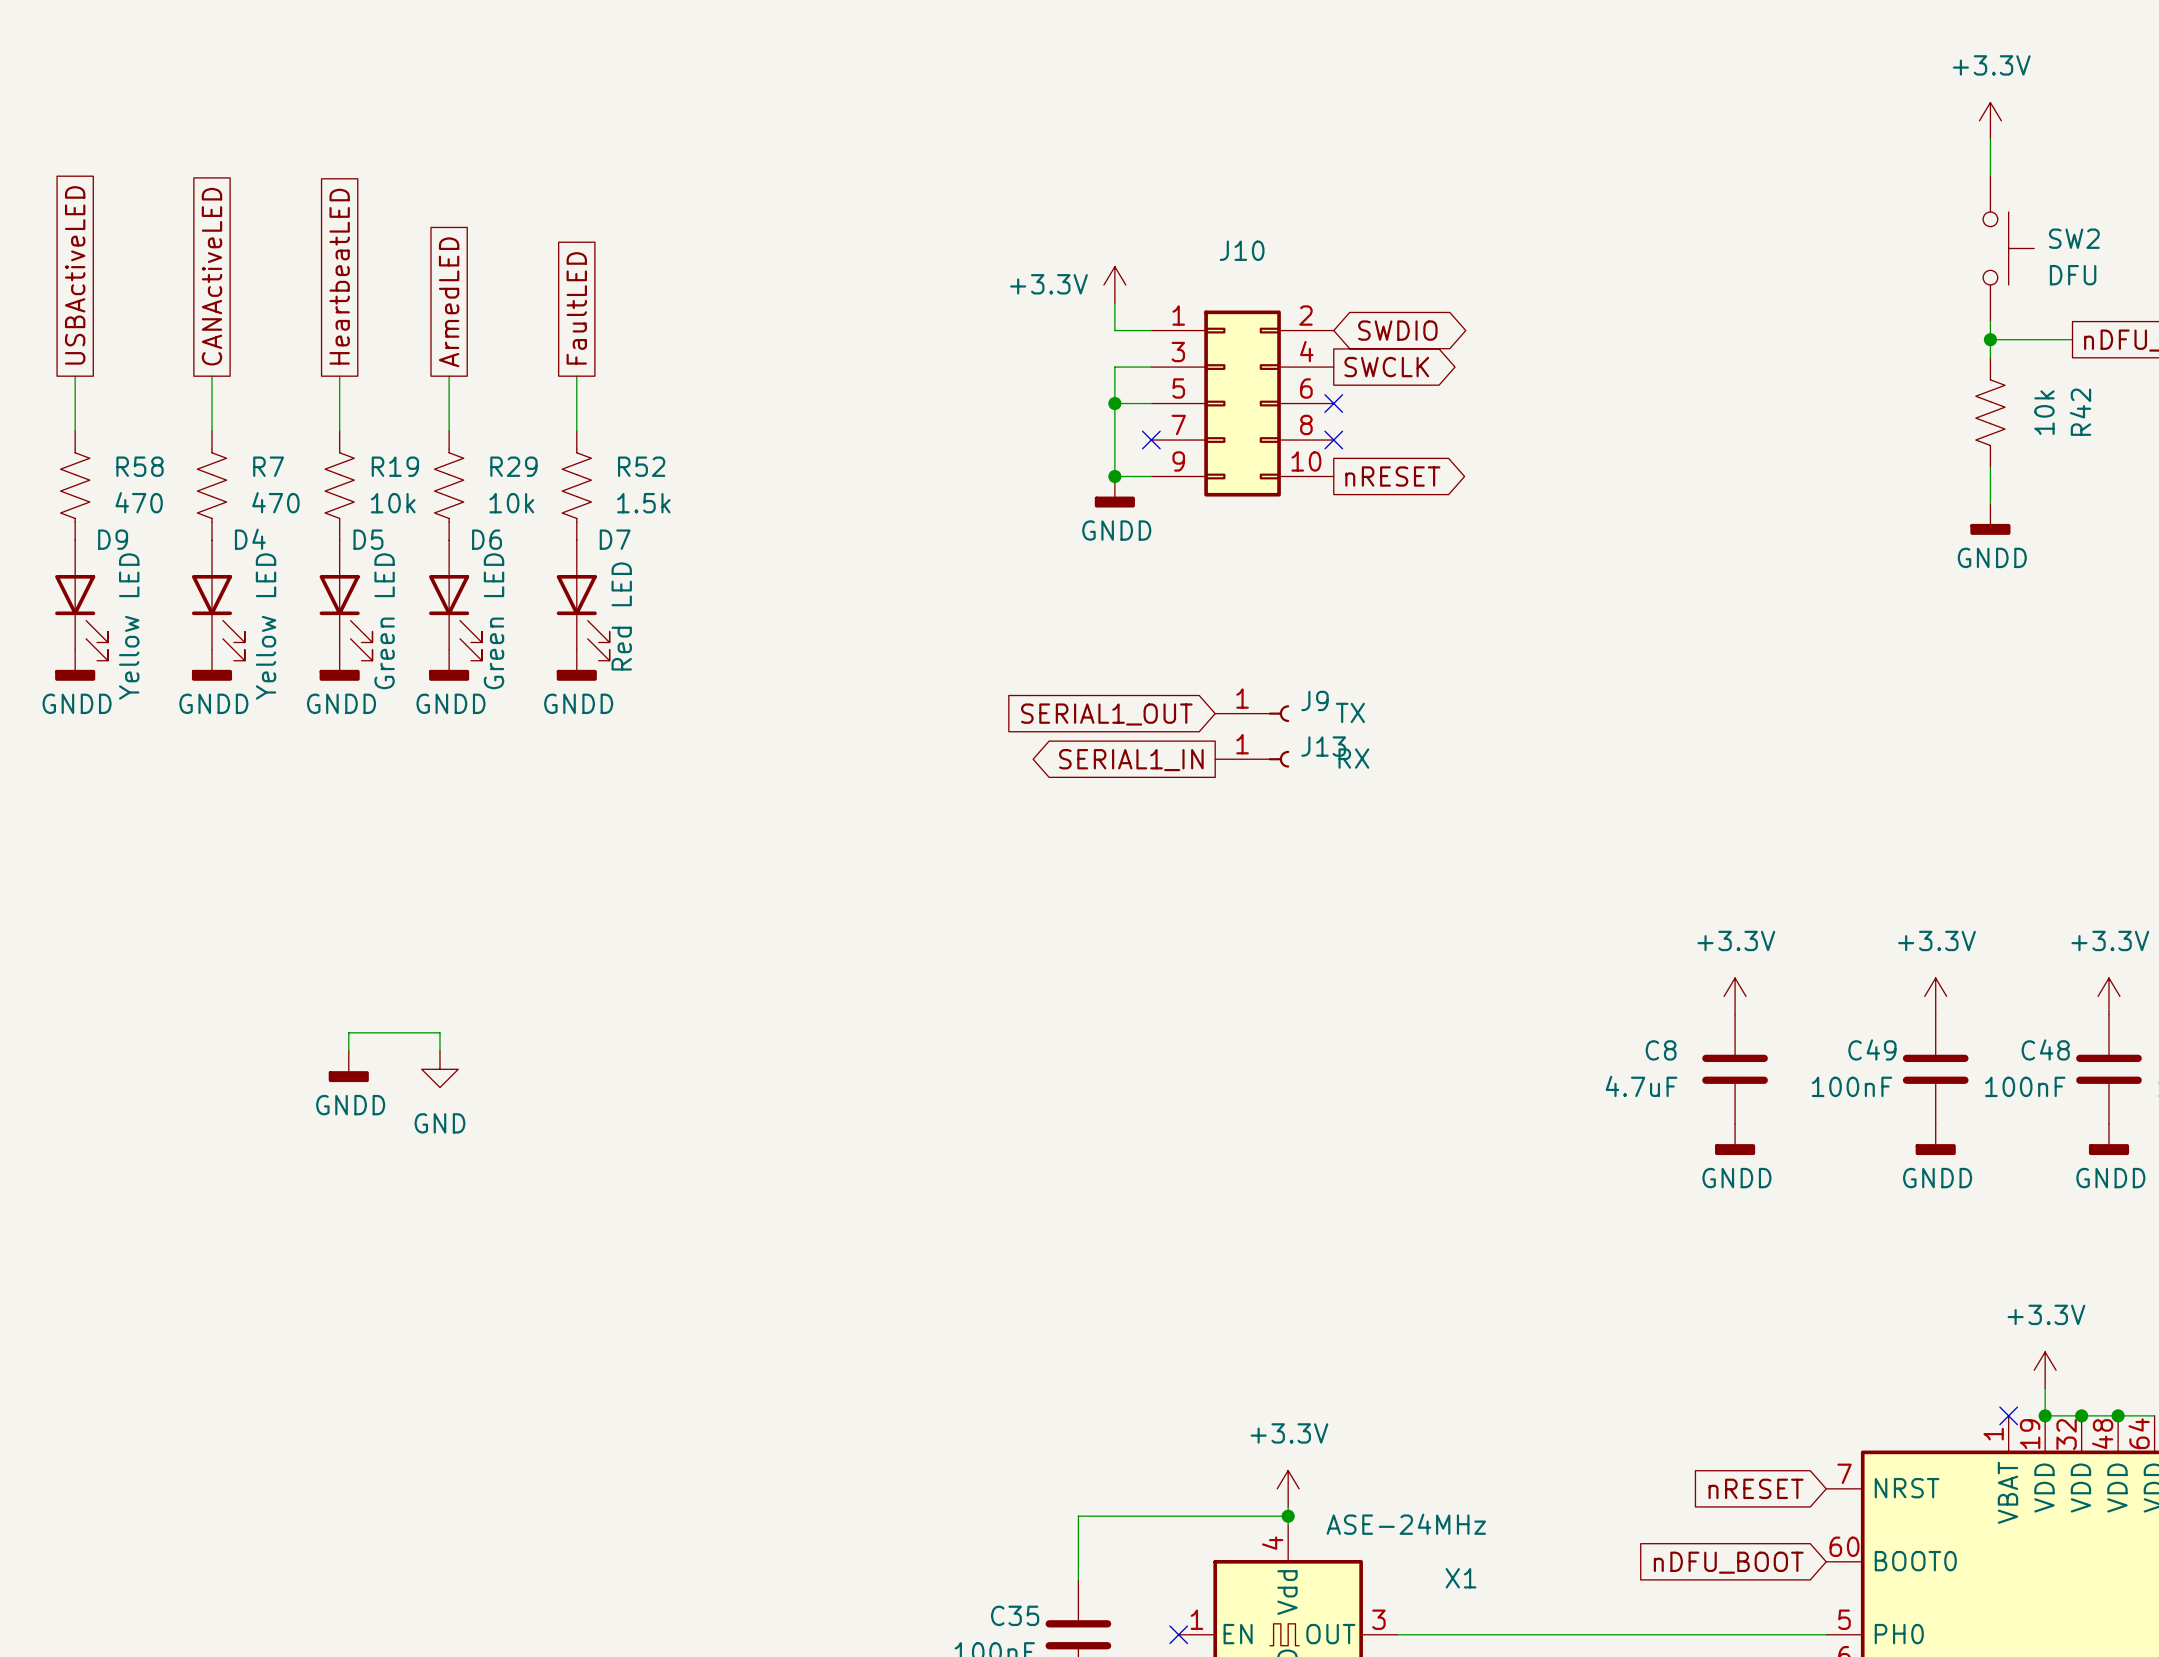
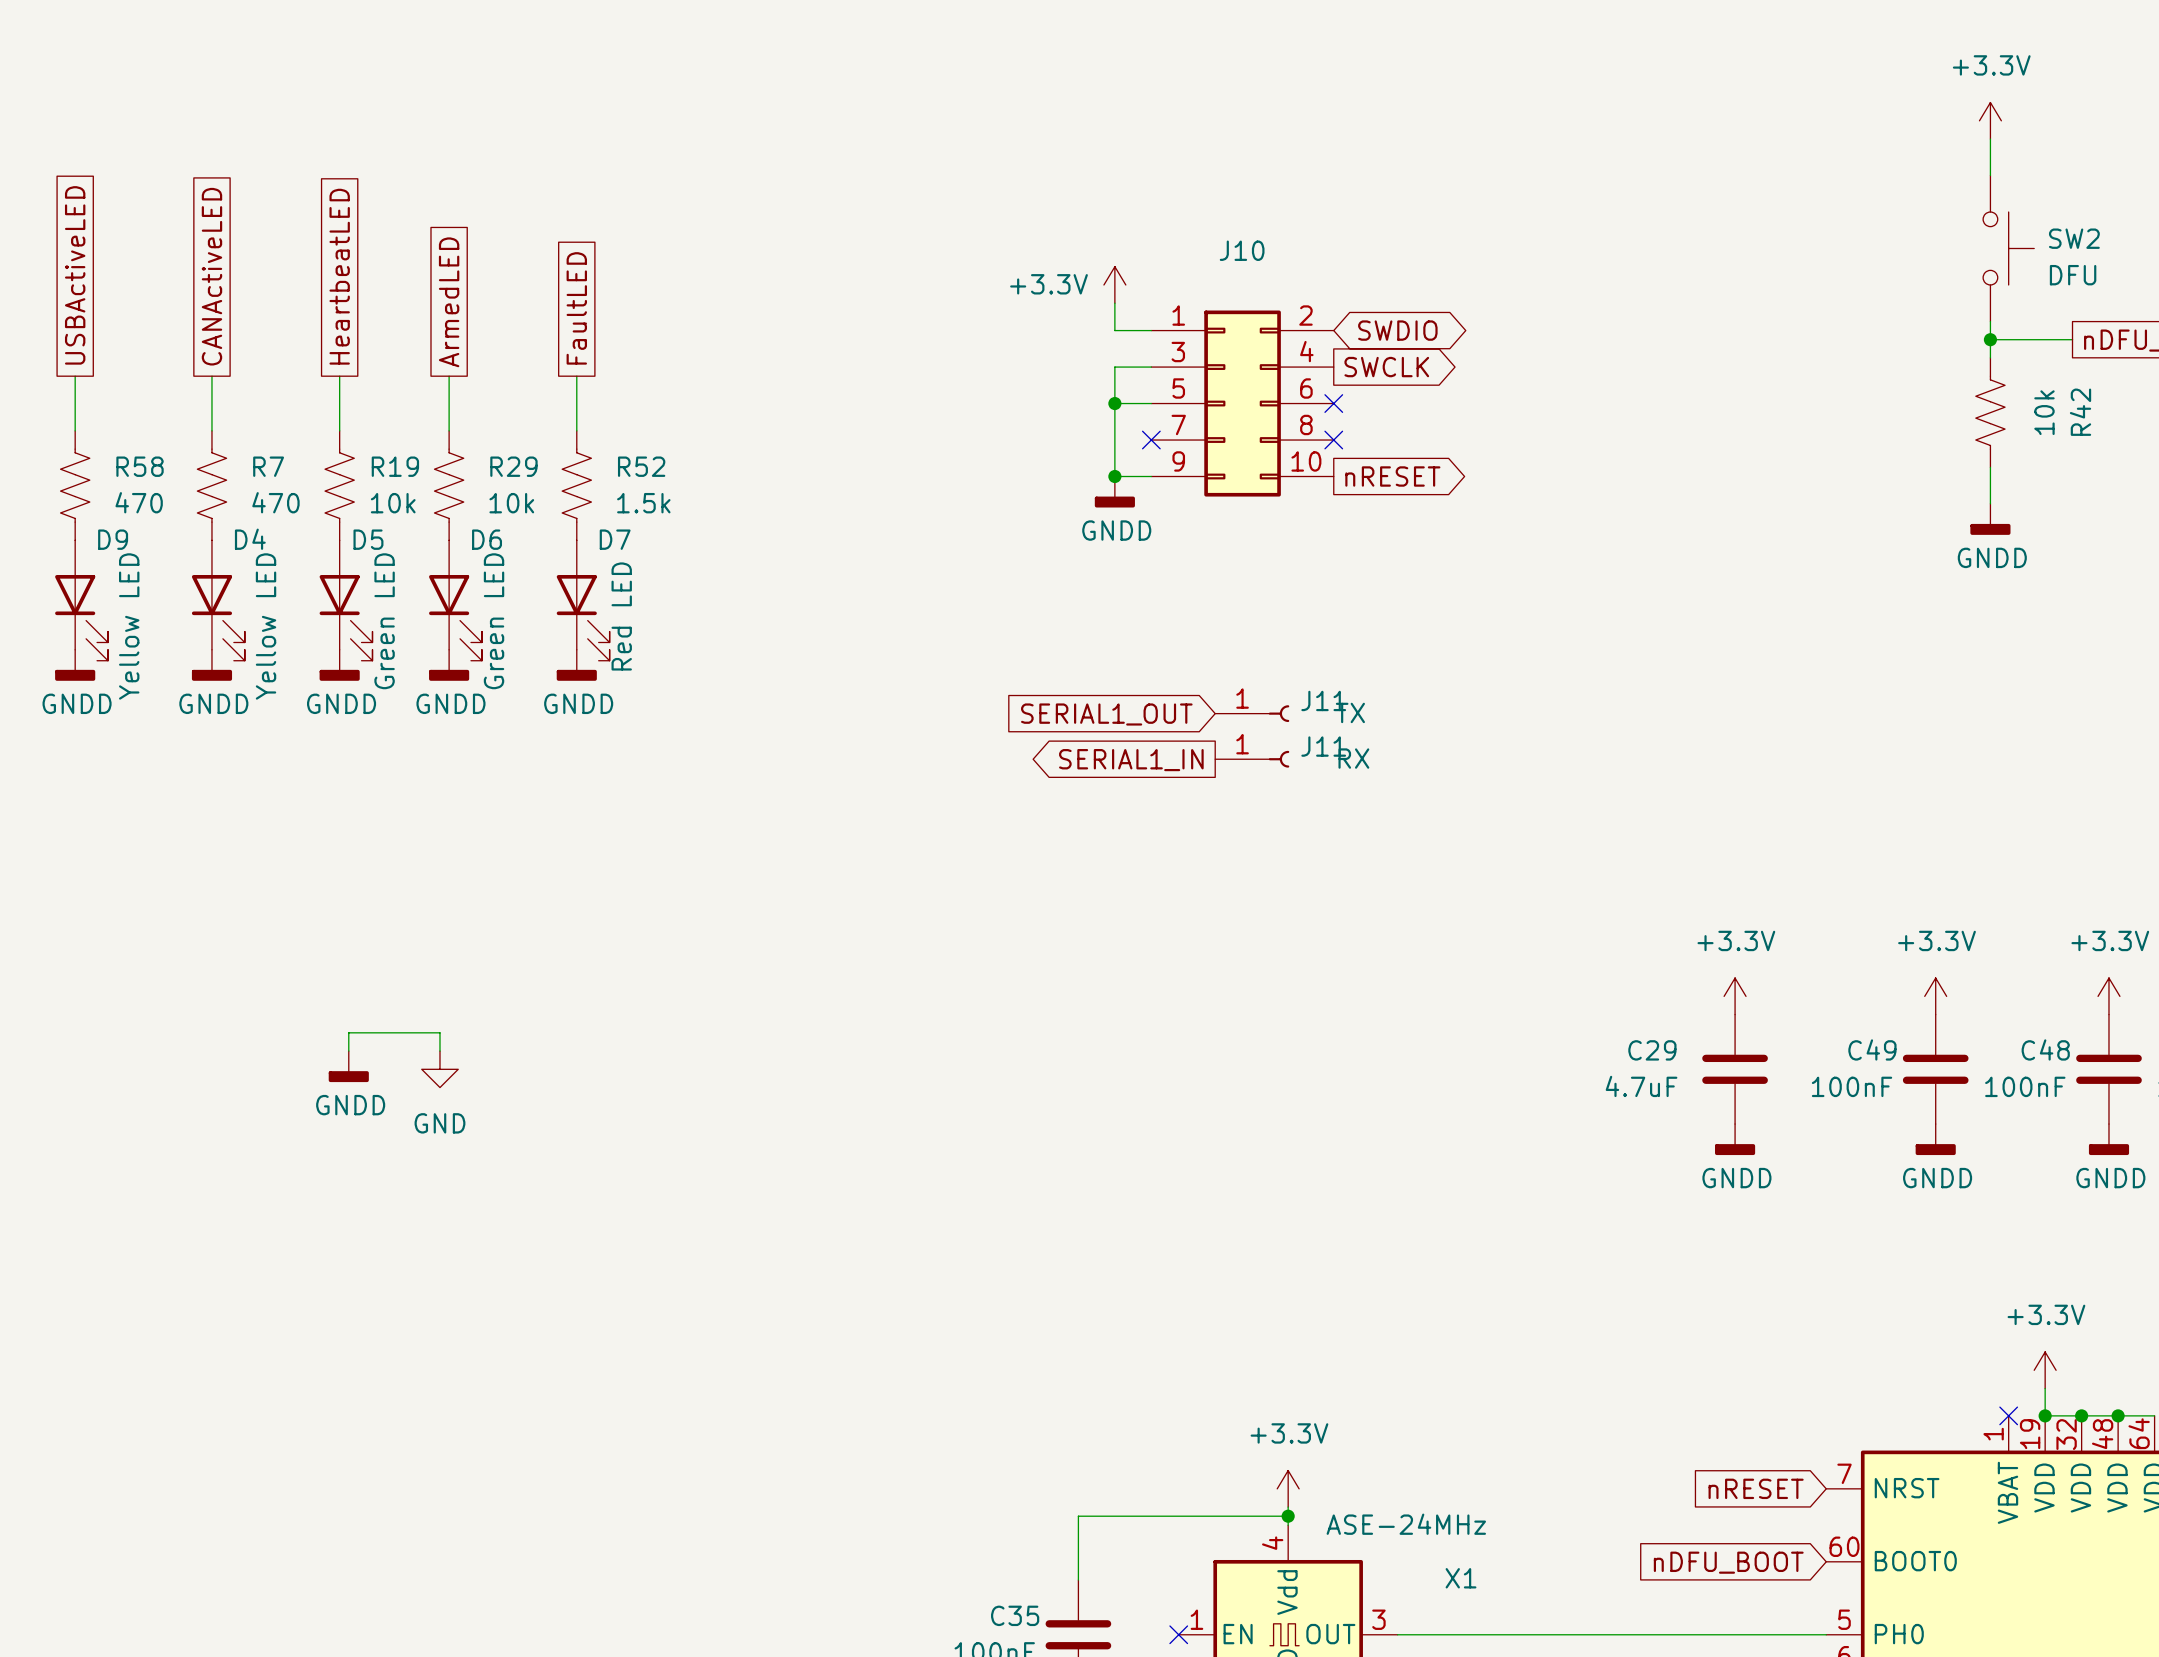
J9 name: J9 (1315, 700) -> J11 (1323, 700)
J13 name: J13 (1323, 746) -> J11 (1323, 746)
C8 name: C8 (1661, 1050) -> C29 (1652, 1050)

